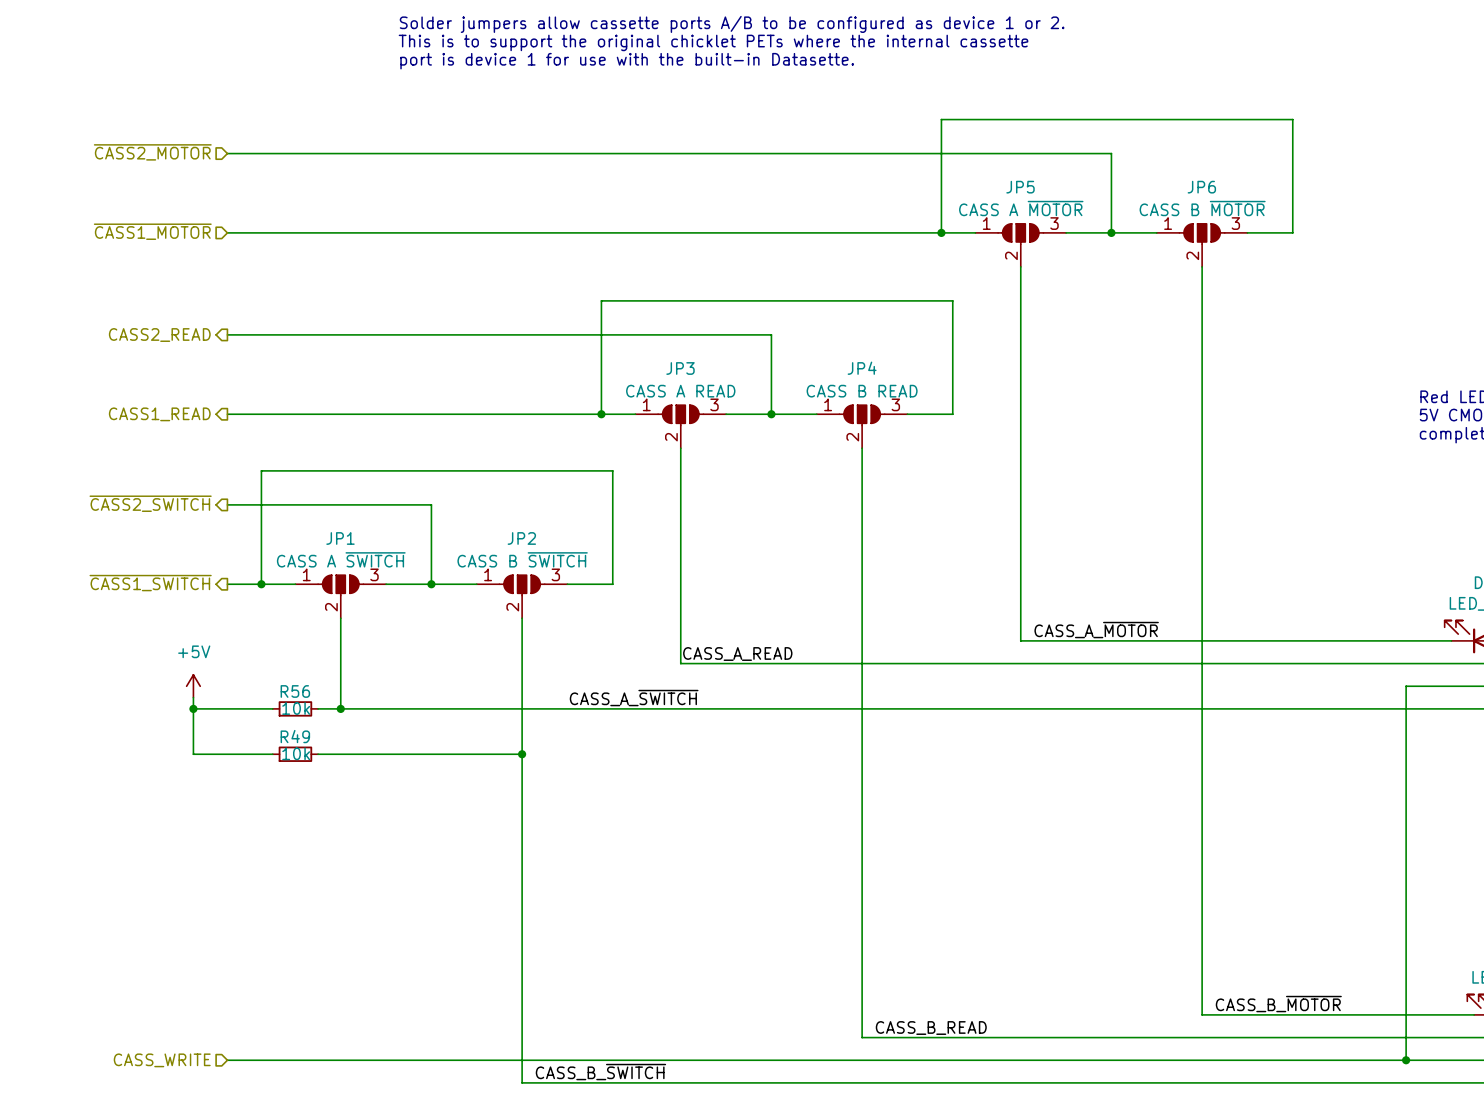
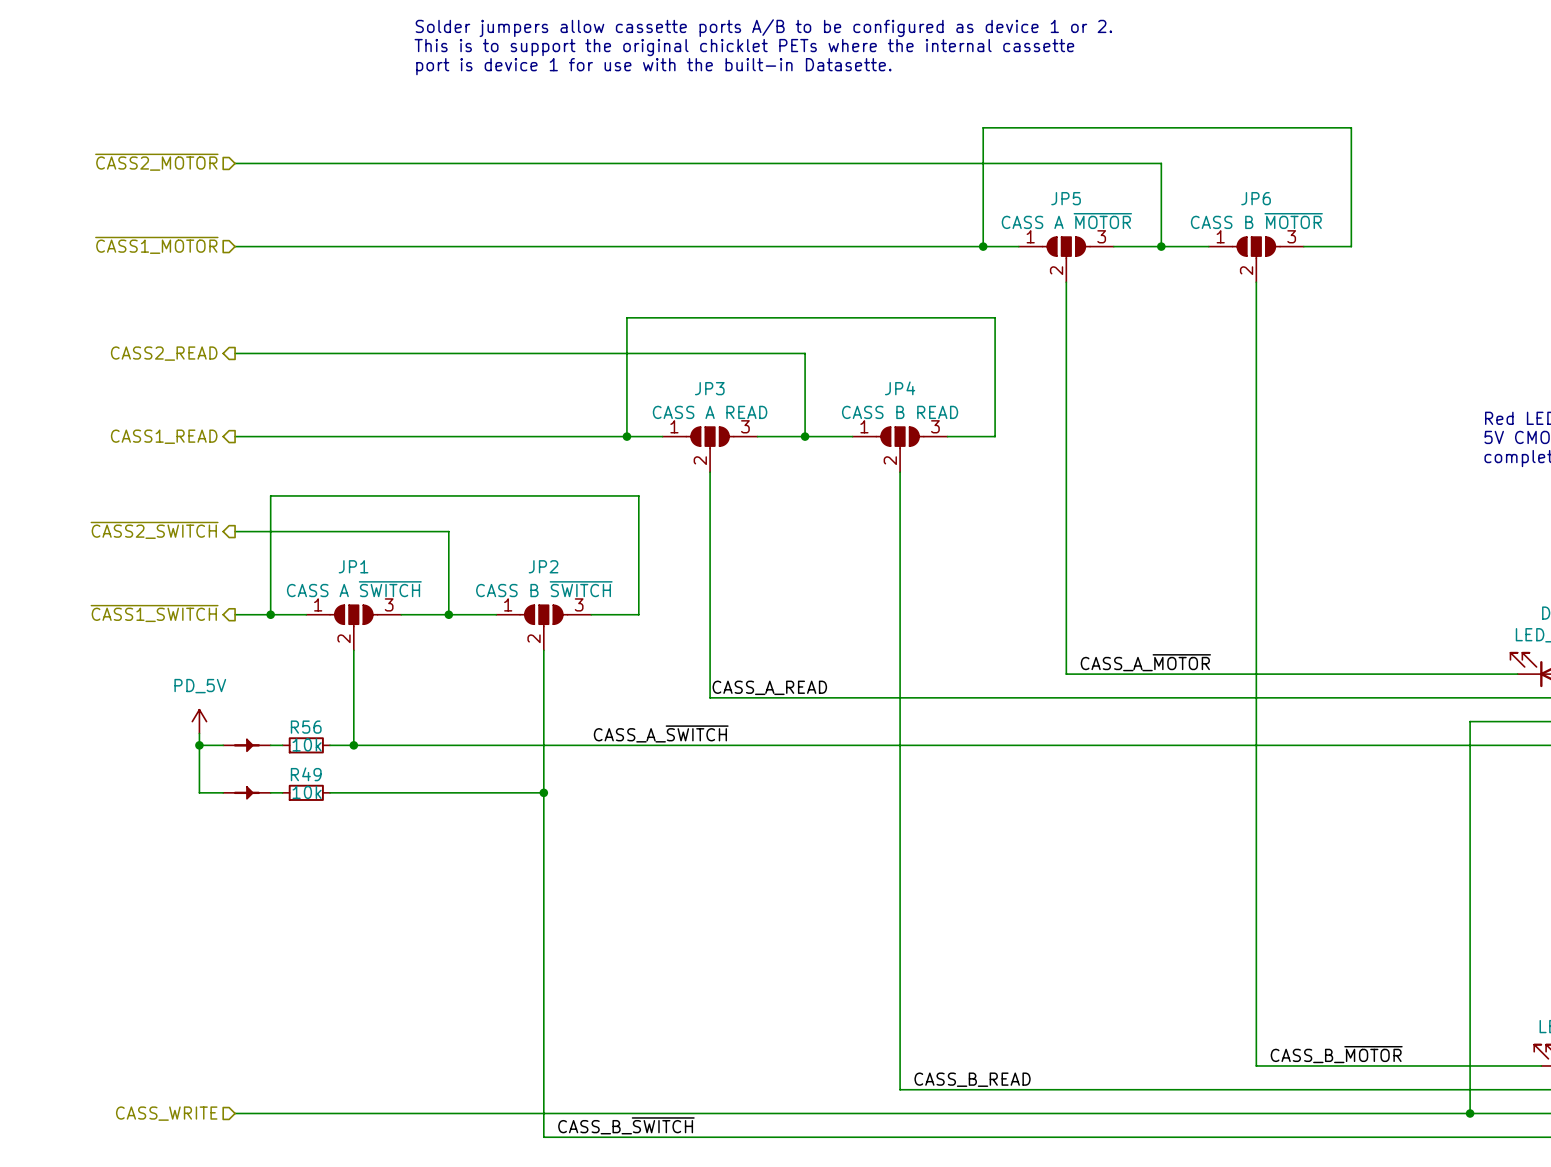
power symbol: +5V (193, 686) -> PD_5V (199, 721)
part: none -> (246, 745)
part: none -> (246, 792)

